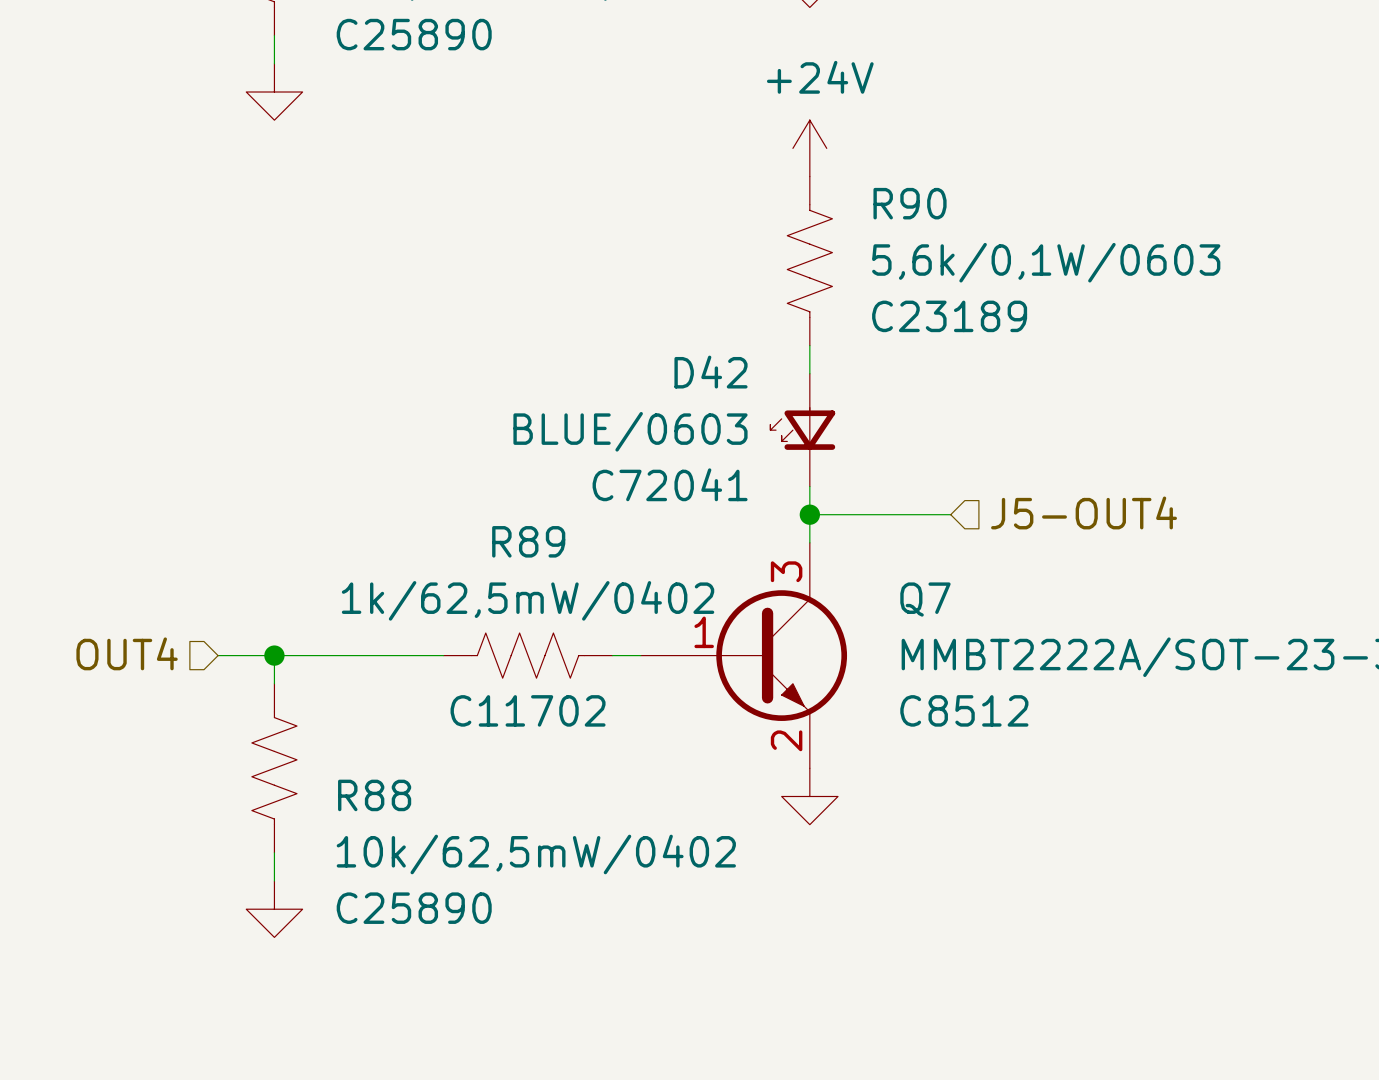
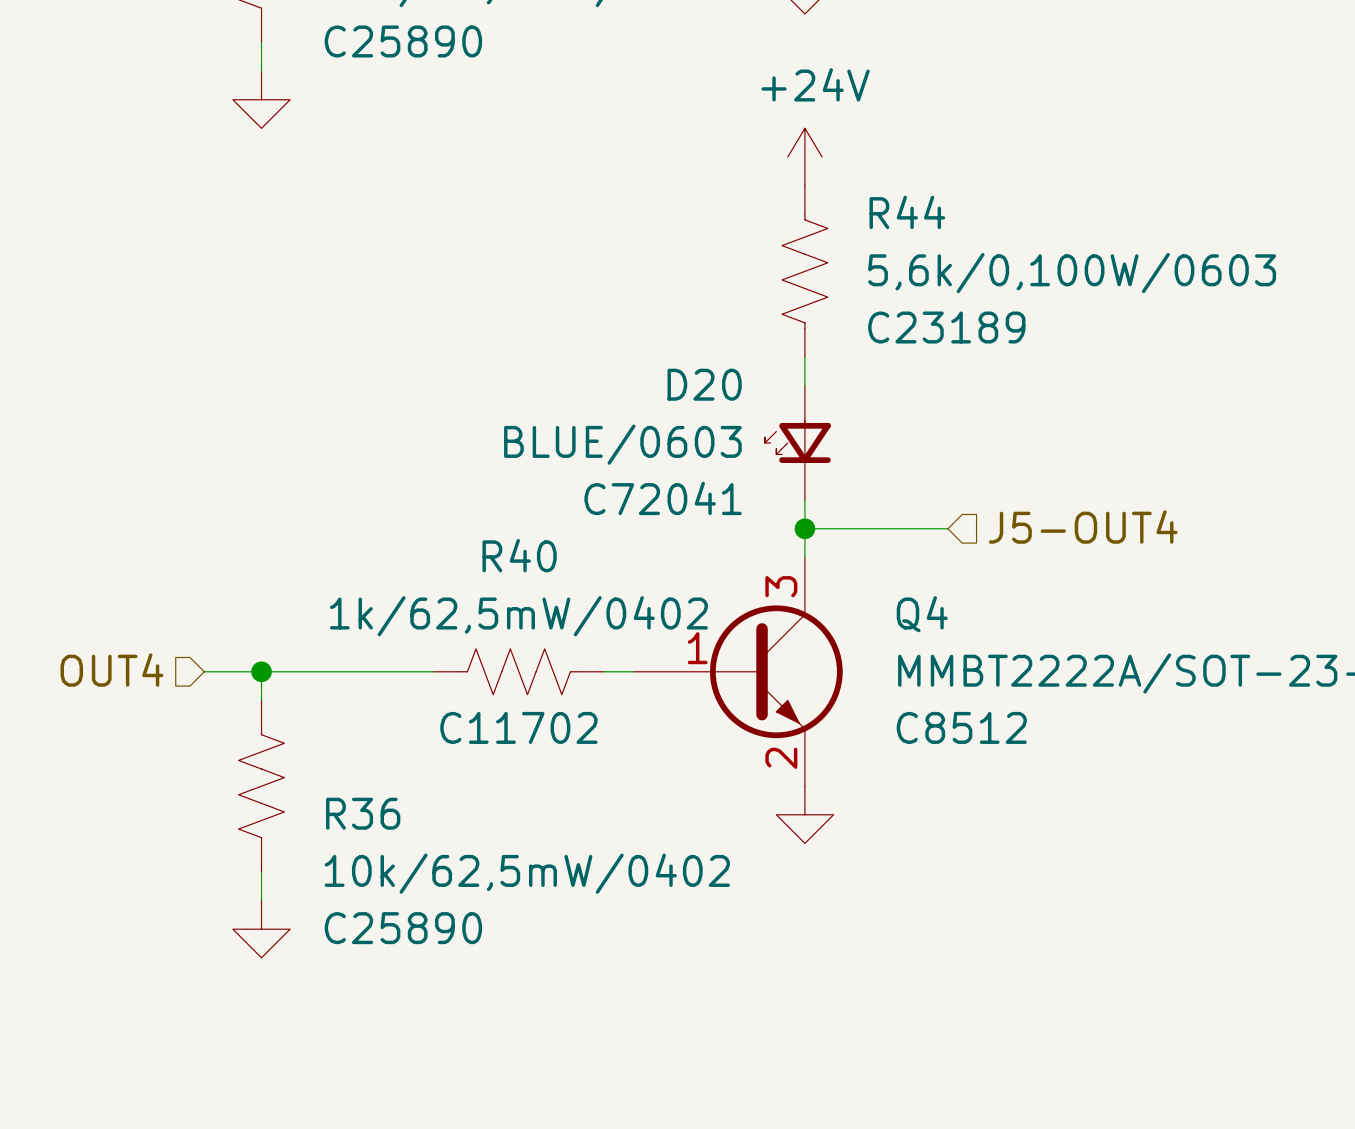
R90 name: R90 (910, 203) -> R44 (907, 212)
R90 value: 5,6k/0,1W/0603 (1046, 262) -> 5,6k/0,100W/0603 (1072, 273)
D42 name: D42 (711, 372) -> D20 (704, 384)
R89 name: R89 (528, 541) -> R40 (519, 555)
Q7 name: Q7 (925, 599) -> Q4 (922, 614)
R88 name: R88 (374, 795) -> R36 (363, 813)

